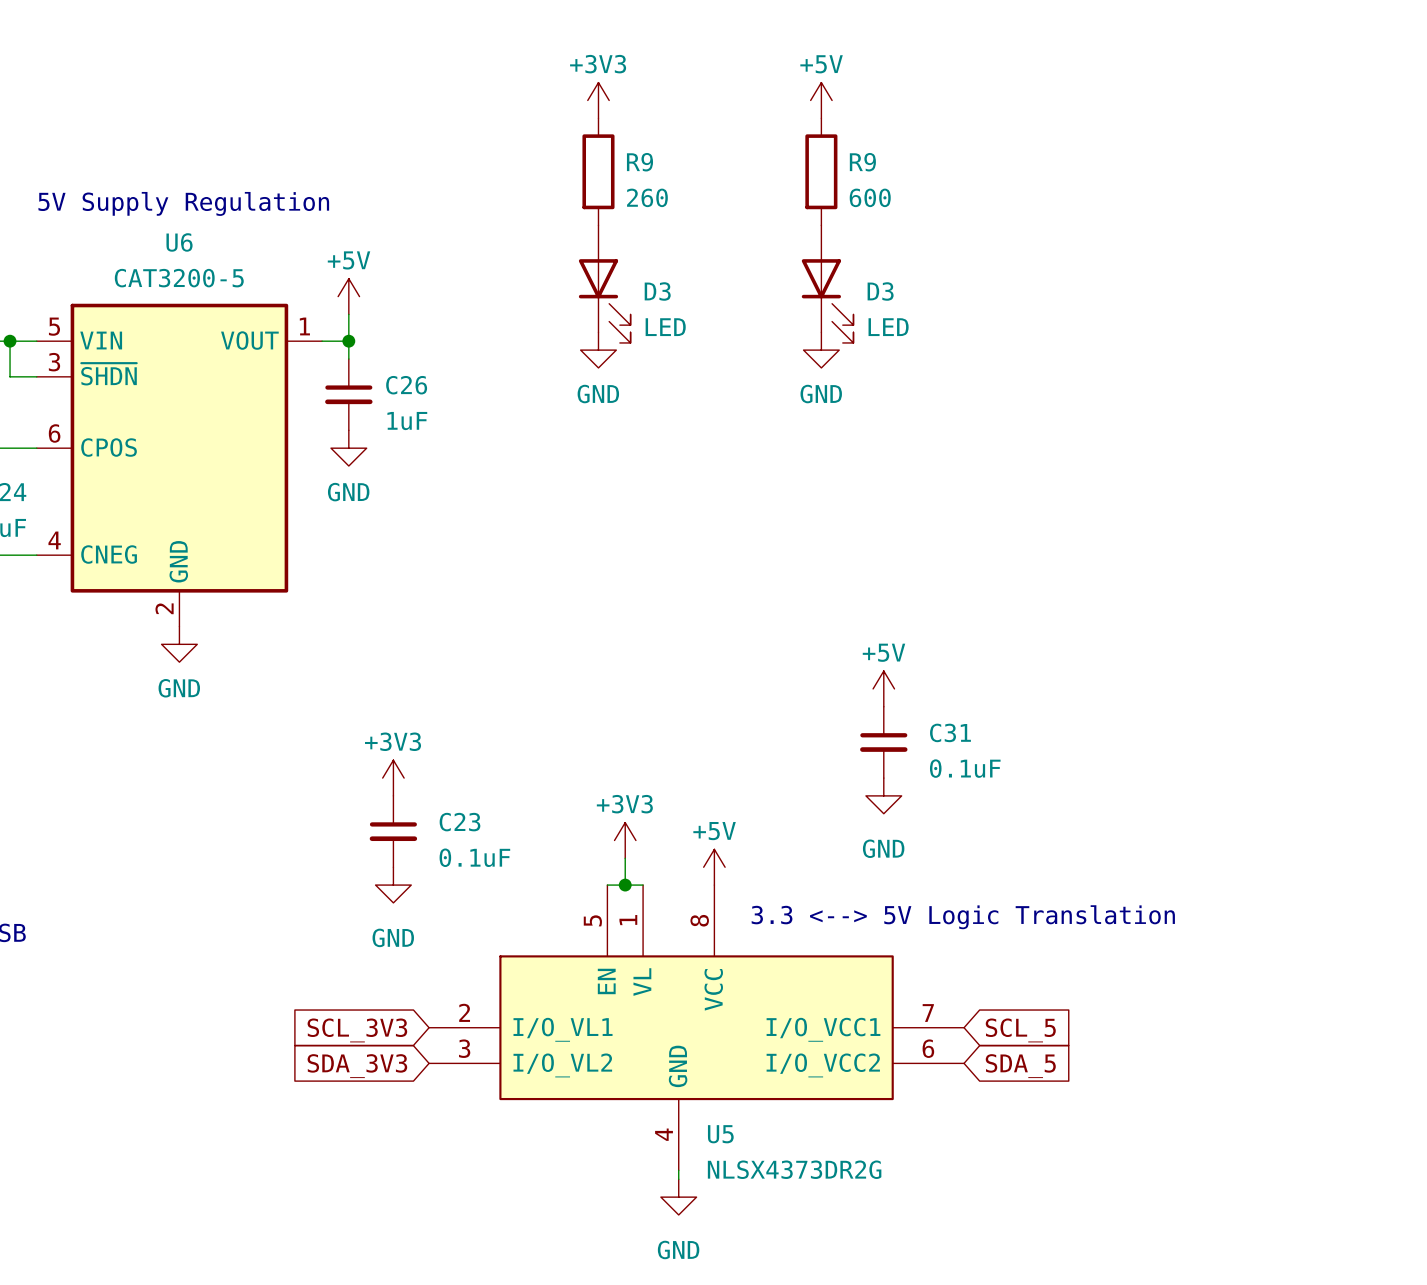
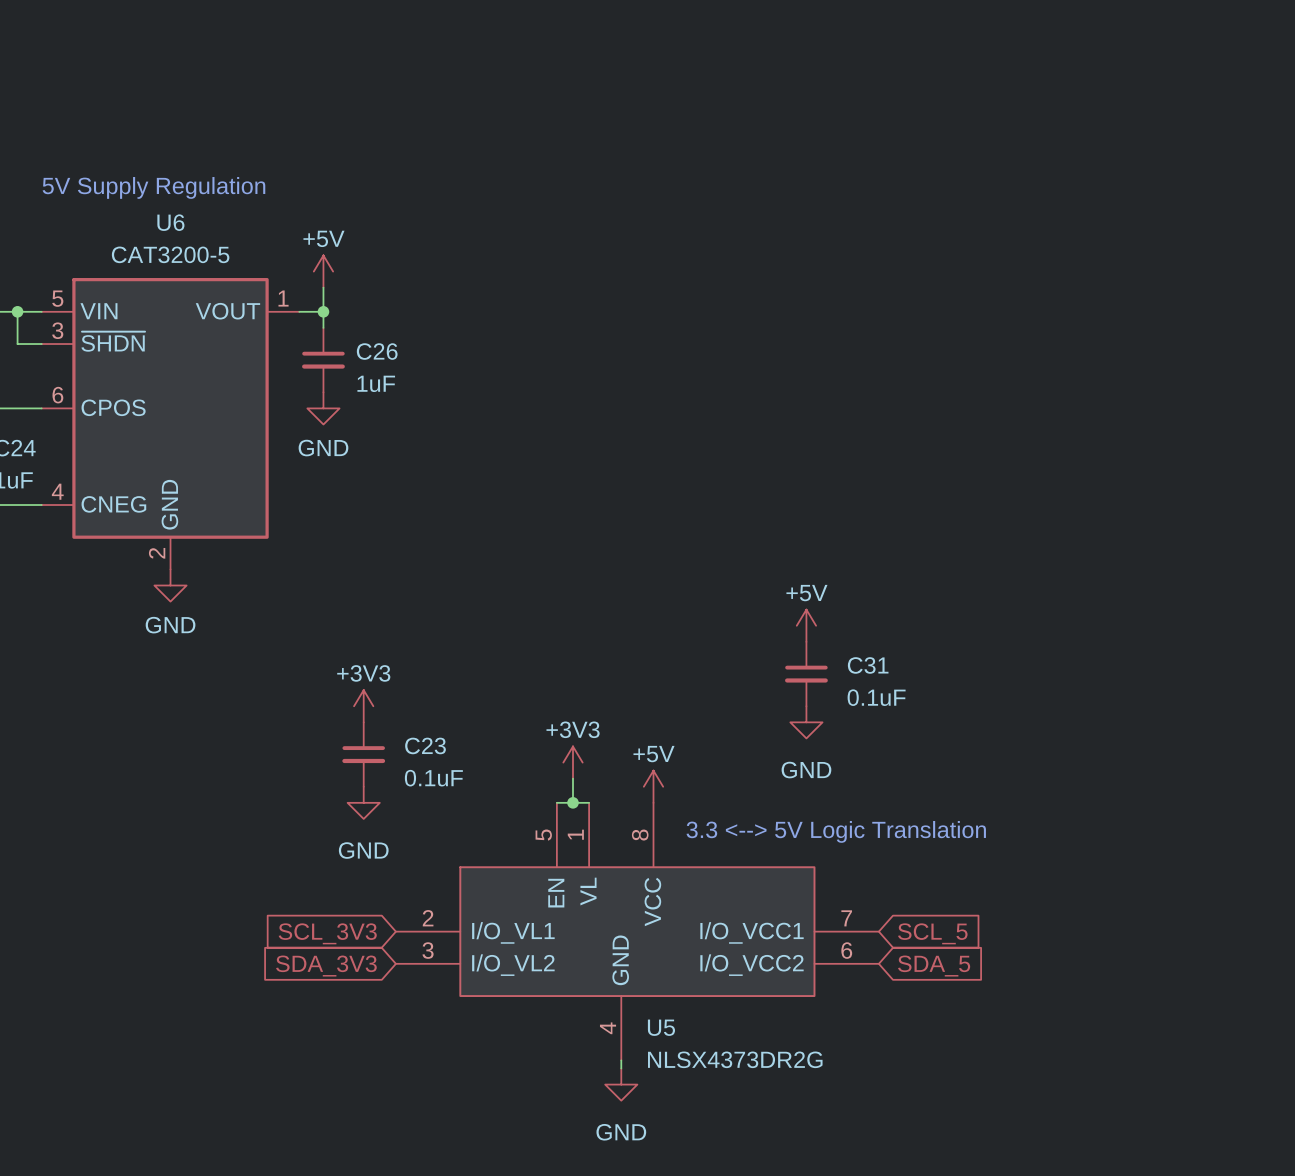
power symbol: +3V3 (598, 100) -> none
power symbol: +5V (821, 100) -> none
R9: 260 (598, 171) -> none
R9: 600 (821, 171) -> none
D3: LED (604, 284) -> none
D3: LED (827, 284) -> none
power symbol: GND (598, 350) -> none
power symbol: GND (821, 350) -> none

